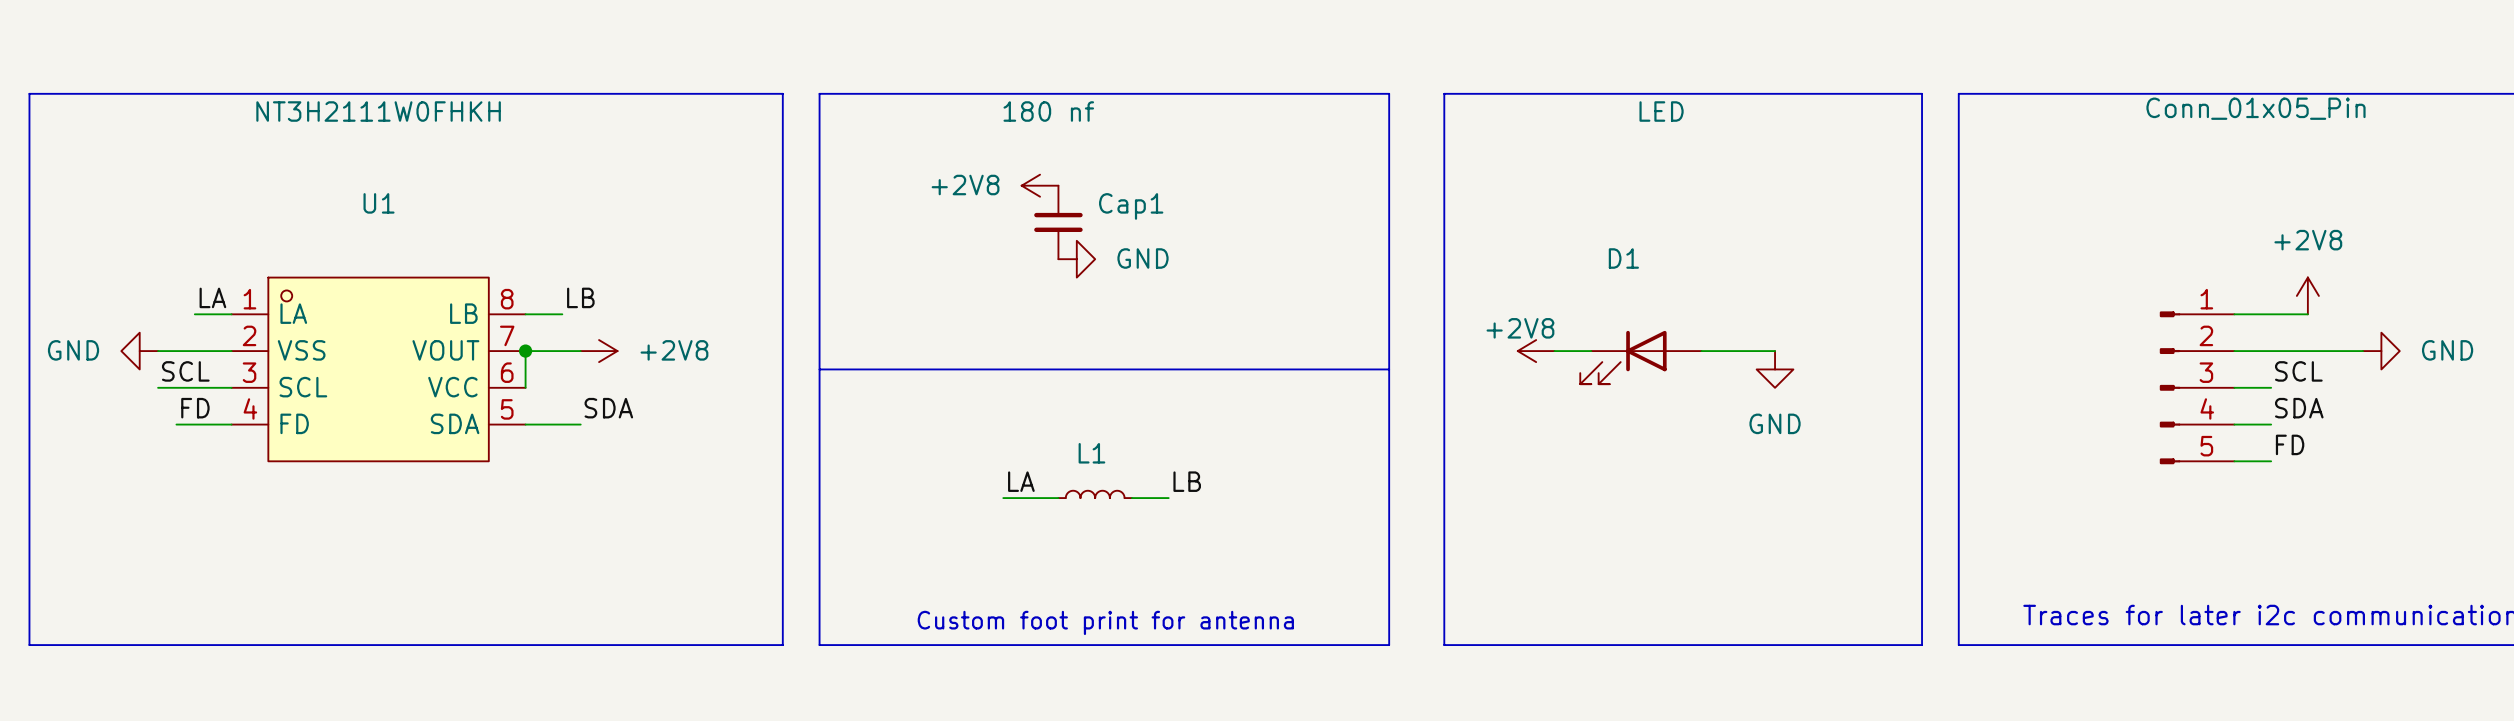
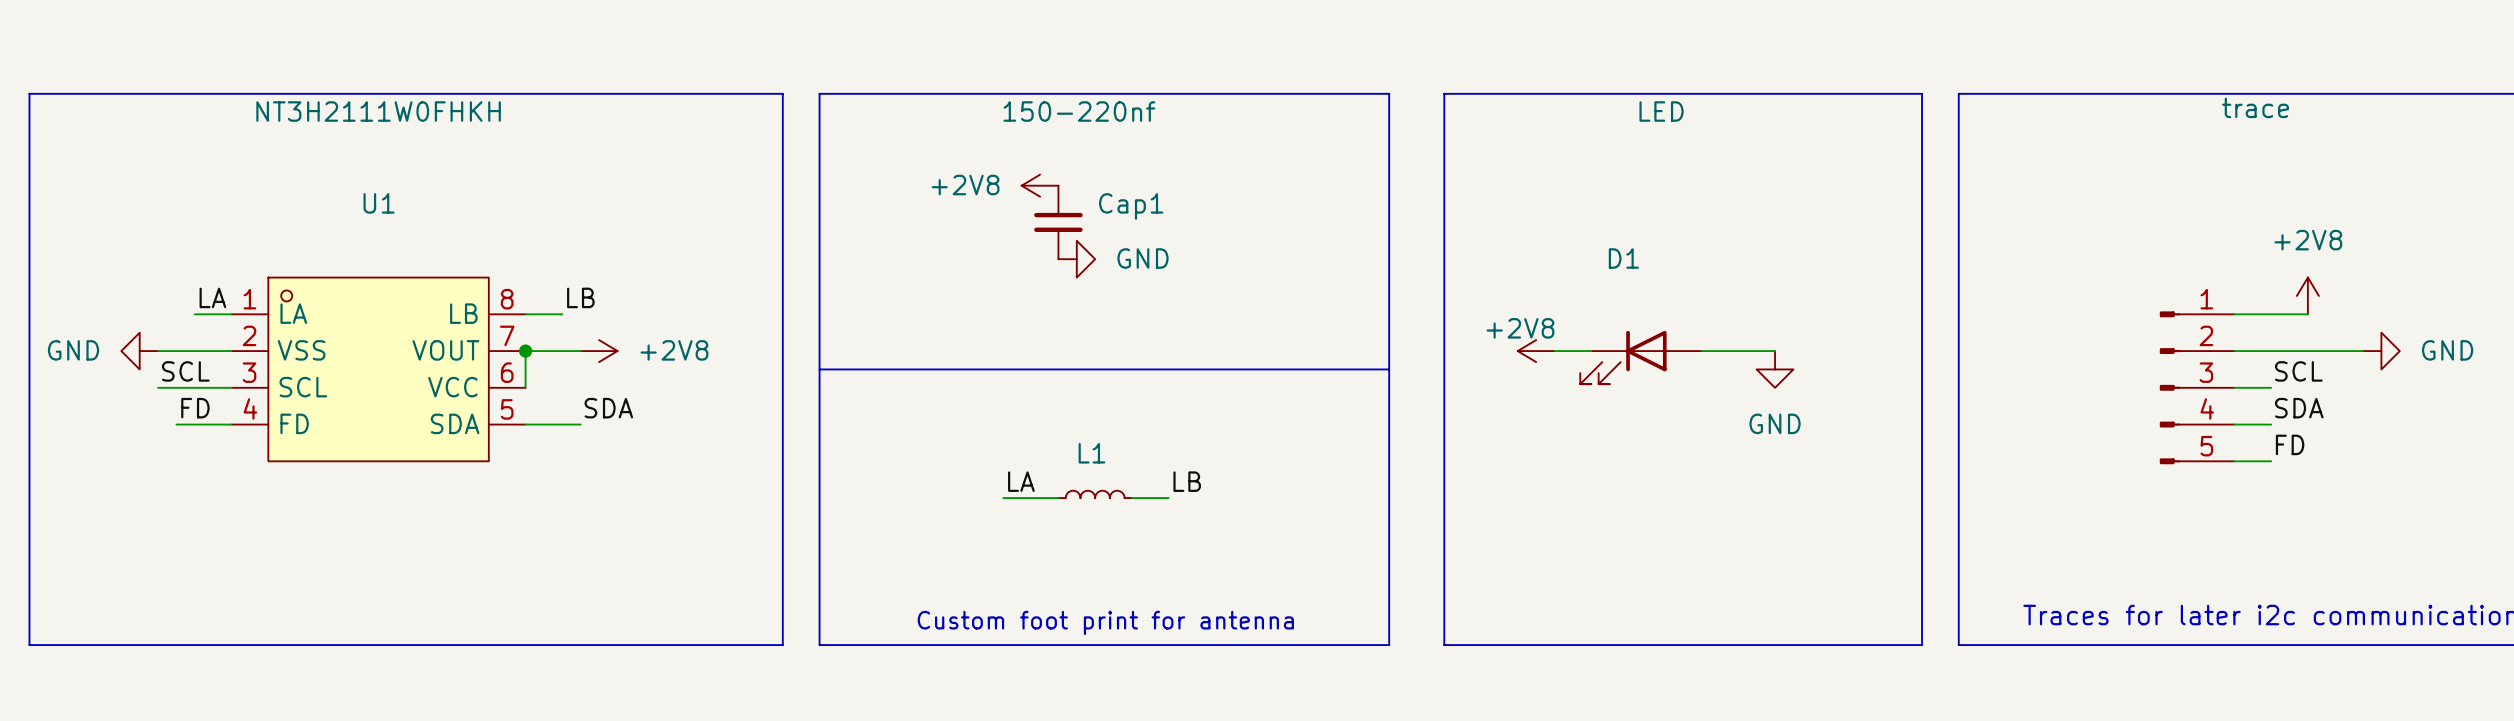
part value: Conn_01x05_Pin (2256, 108) -> trace (2255, 107)
Cap1 value: 180 nf (1048, 111) -> 150-220nf (1079, 111)

